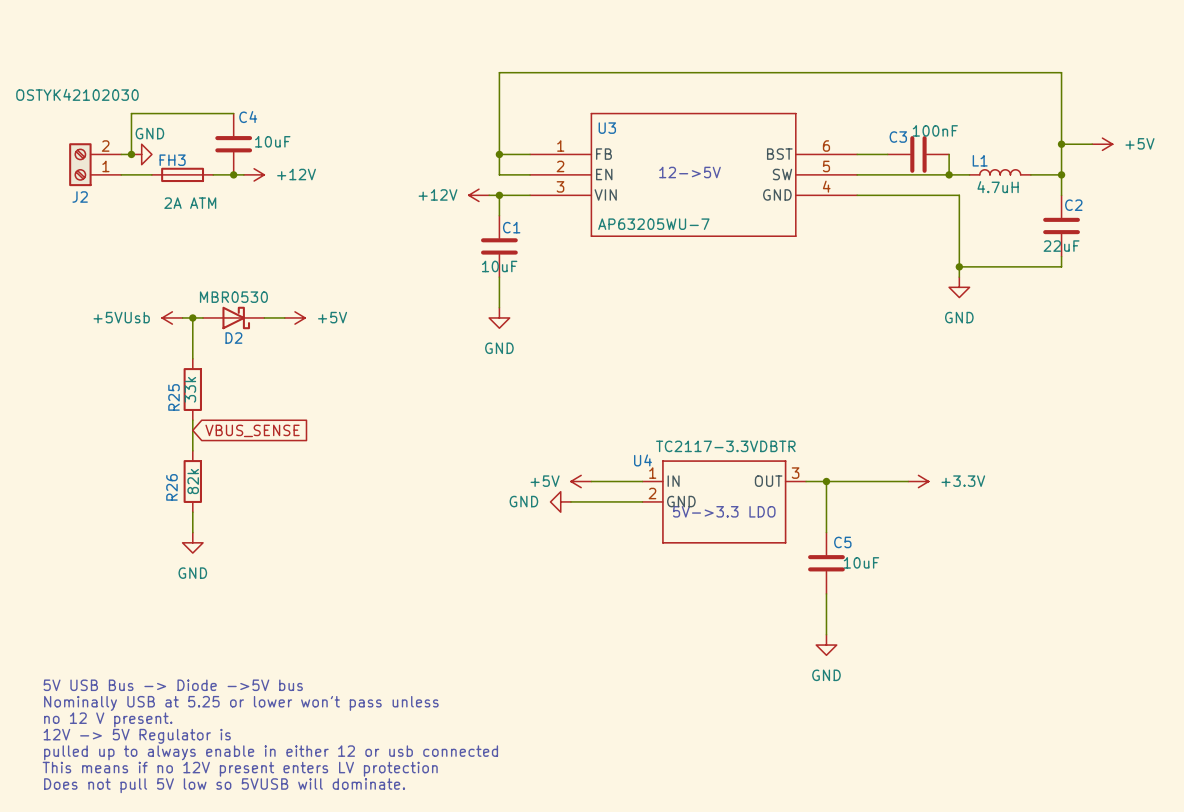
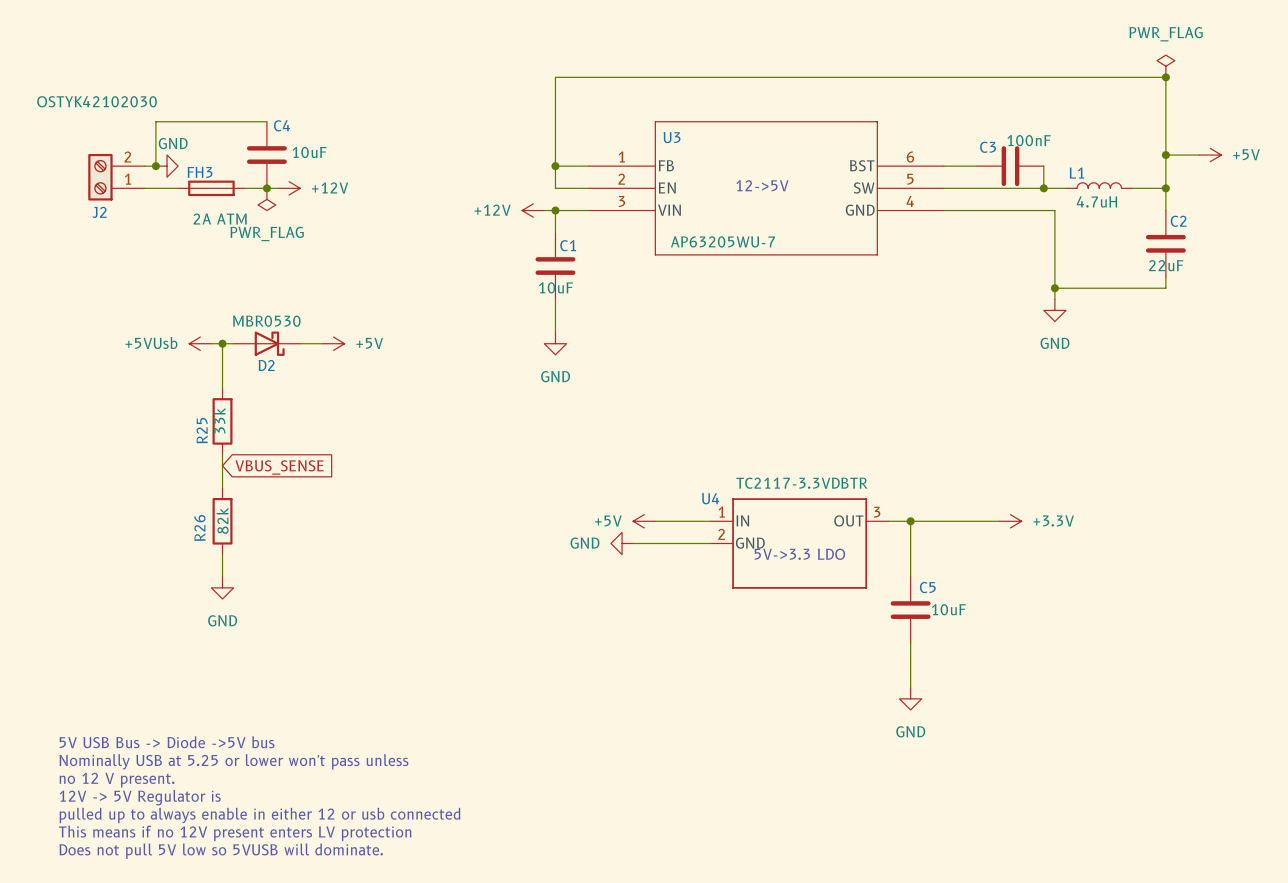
power symbol: none -> PWR_FLAG (1165, 66)
junction: none -> (1165, 77)
power symbol: none -> PWR_FLAG (266, 199)

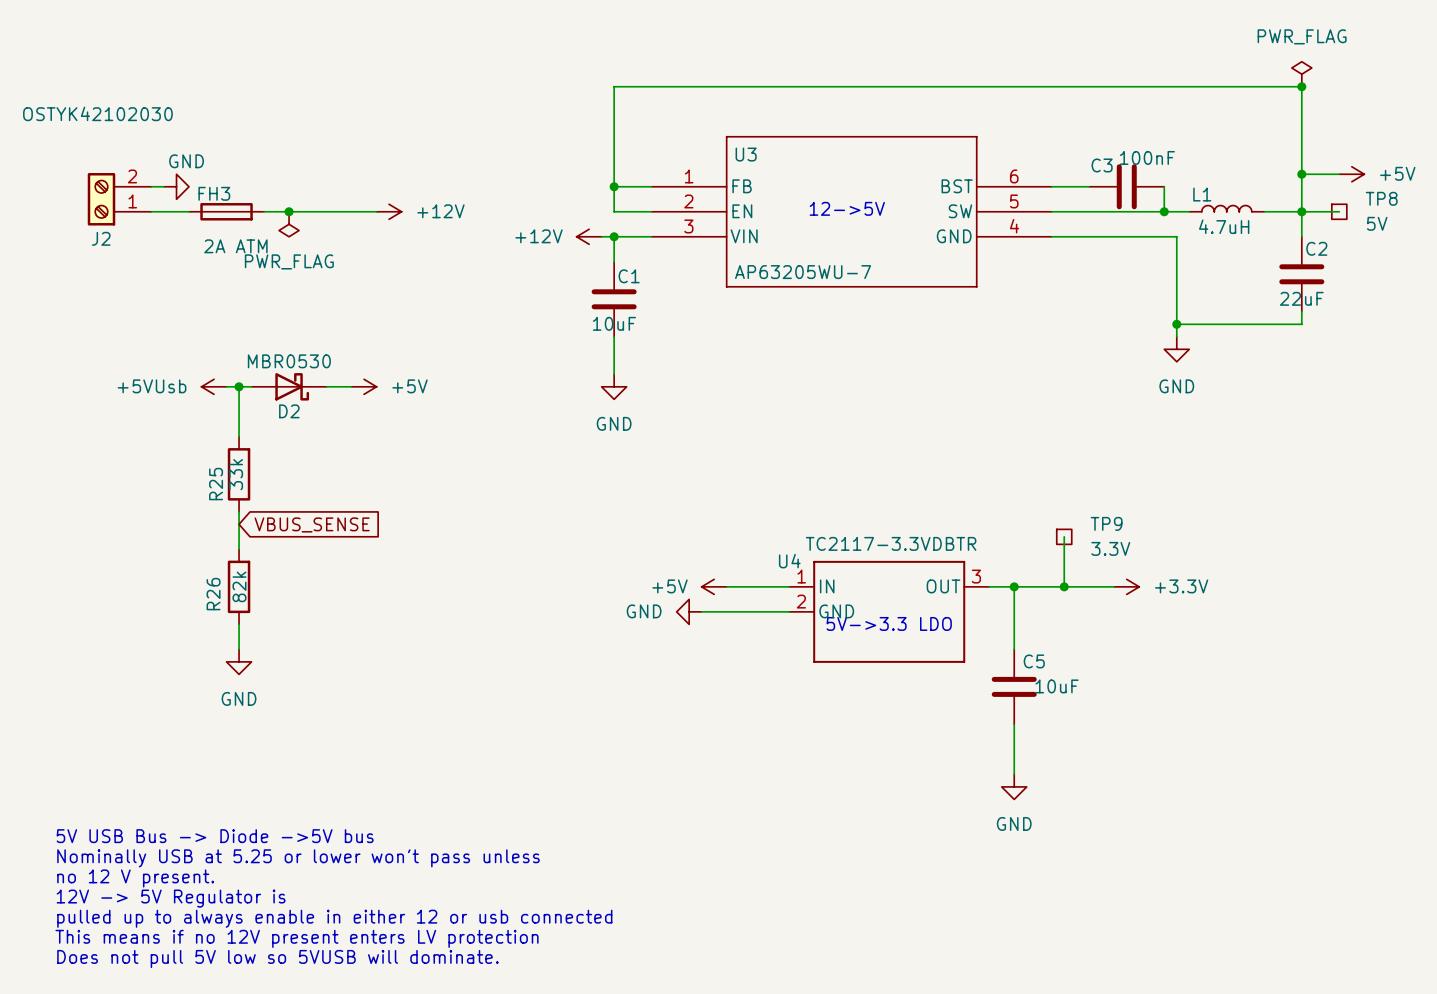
wire: (266, 121) (155, 121) (155, 166) -> none
C4: 10uF (266, 155) -> none
junction: (155, 166) -> none
wire: none -> (301, 211) (376, 211)
power symbol position: +12V (289, 188) -> +12V (389, 211)
wire: none -> (1301, 211) (1339, 211)
TP8: none -> 5V (1339, 211)
wire: none -> (1064, 536) (1064, 586)
TP9: none -> 3.3V (1064, 536)
junction: none -> (1064, 586)

